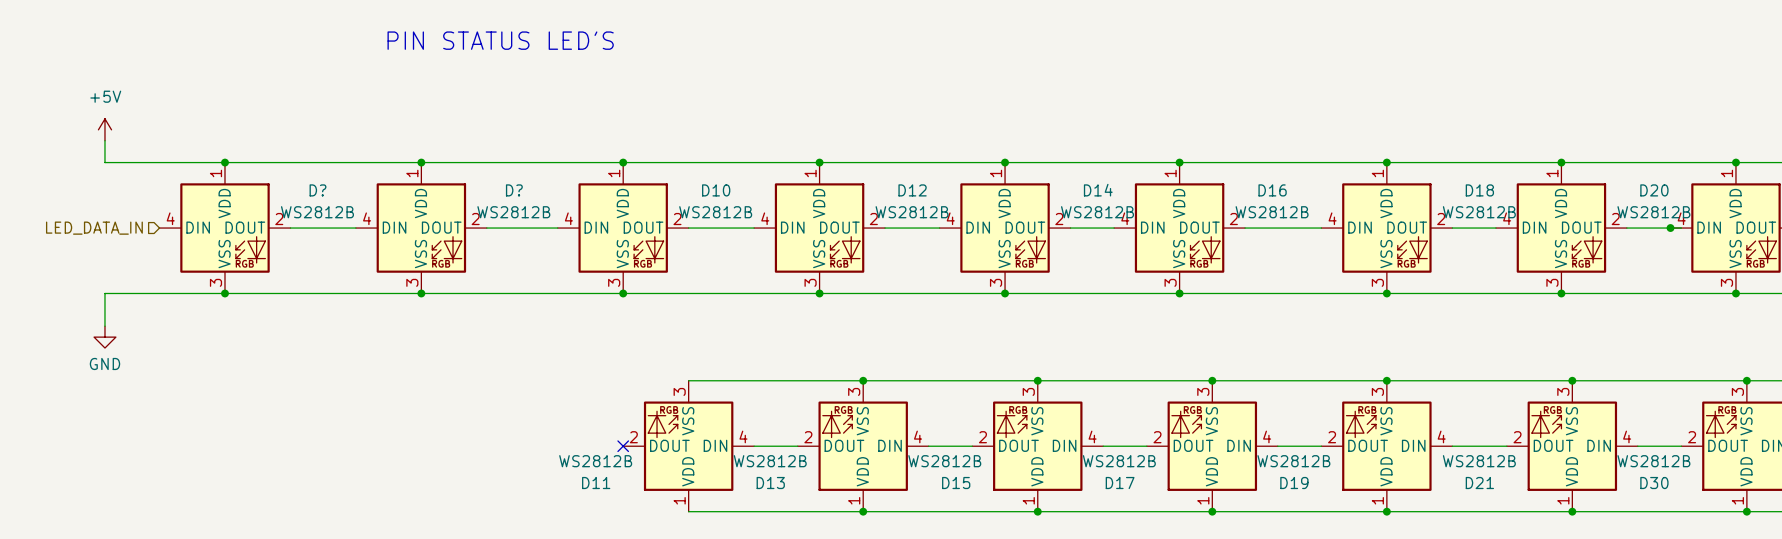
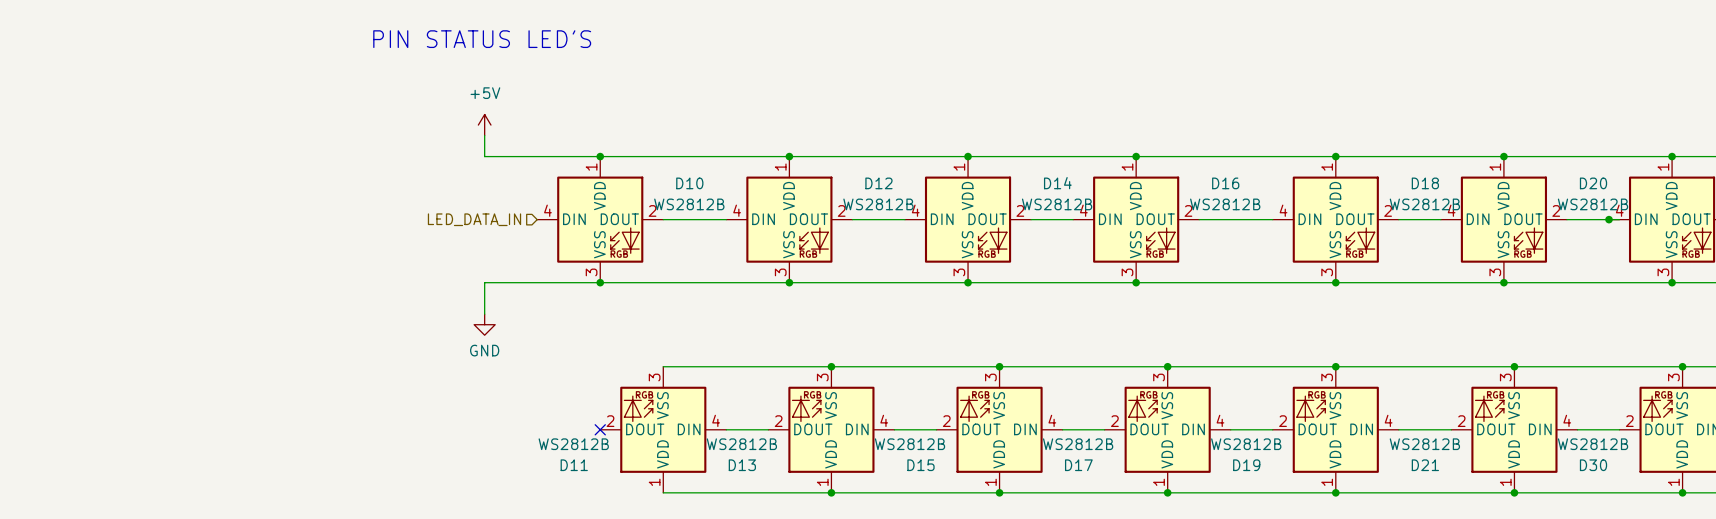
power symbol: +5V (104, 129) -> none
power symbol: none -> +5V (484, 125)
wire: (104, 140) (104, 162) (503, 162) -> (484, 135) (484, 156)
junction: (224, 162) -> none
junction: (421, 162) -> none
hierarchical label: LED_DATA_IN (94, 228) -> none
D?: WS2812B (224, 228) -> none
wire: (290, 228) (355, 228) -> none
D?: WS2812B (421, 228) -> none
wire: (486, 228) (557, 228) -> none
hierarchical label: none -> LED_DATA_IN (474, 219)
junction: (224, 293) -> none
junction: (421, 293) -> none
wire: (503, 293) (104, 293) (104, 326) -> (484, 282) (484, 314)
power symbol: GND (104, 337) -> none
power symbol: none -> GND (484, 324)

